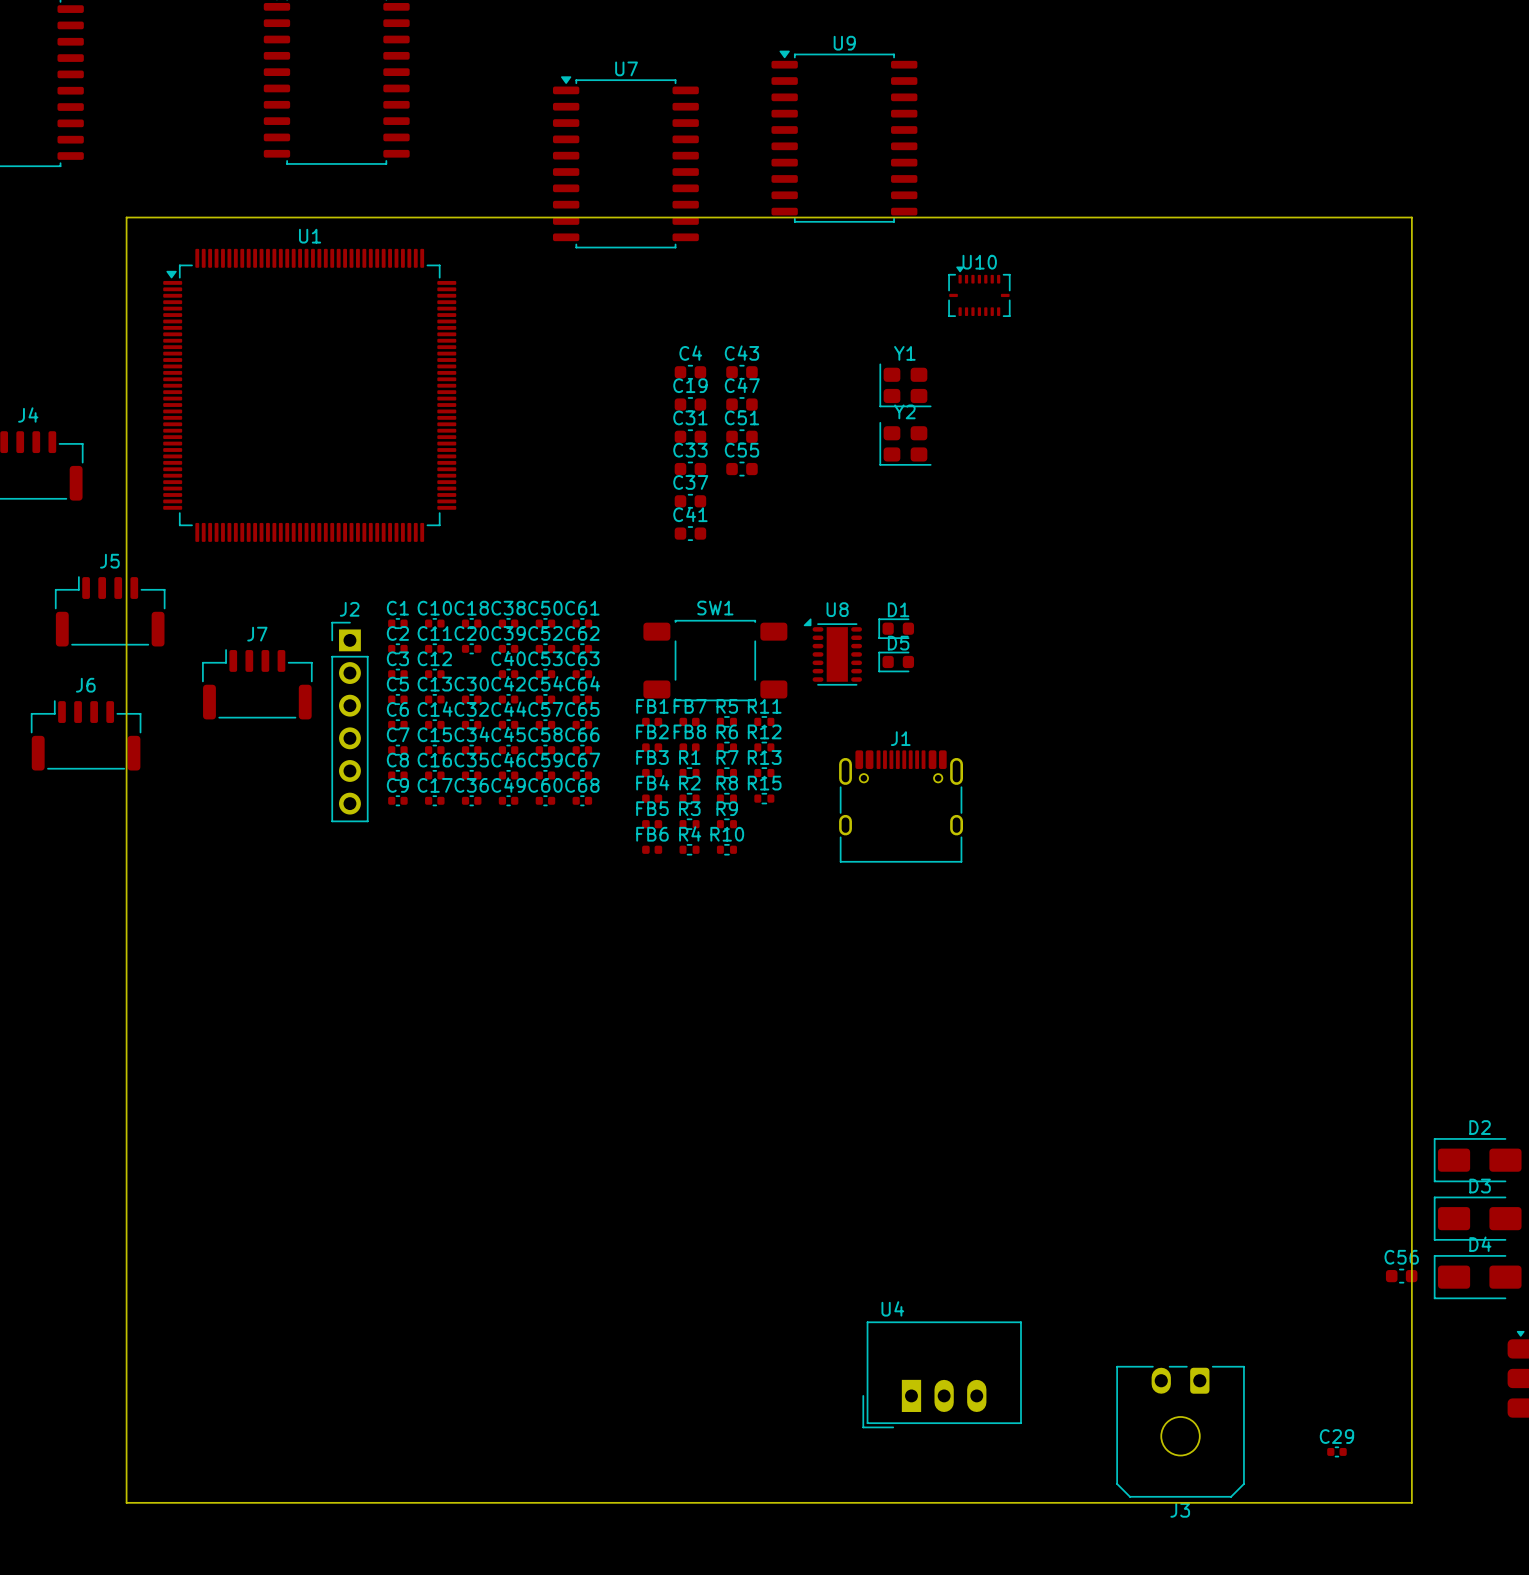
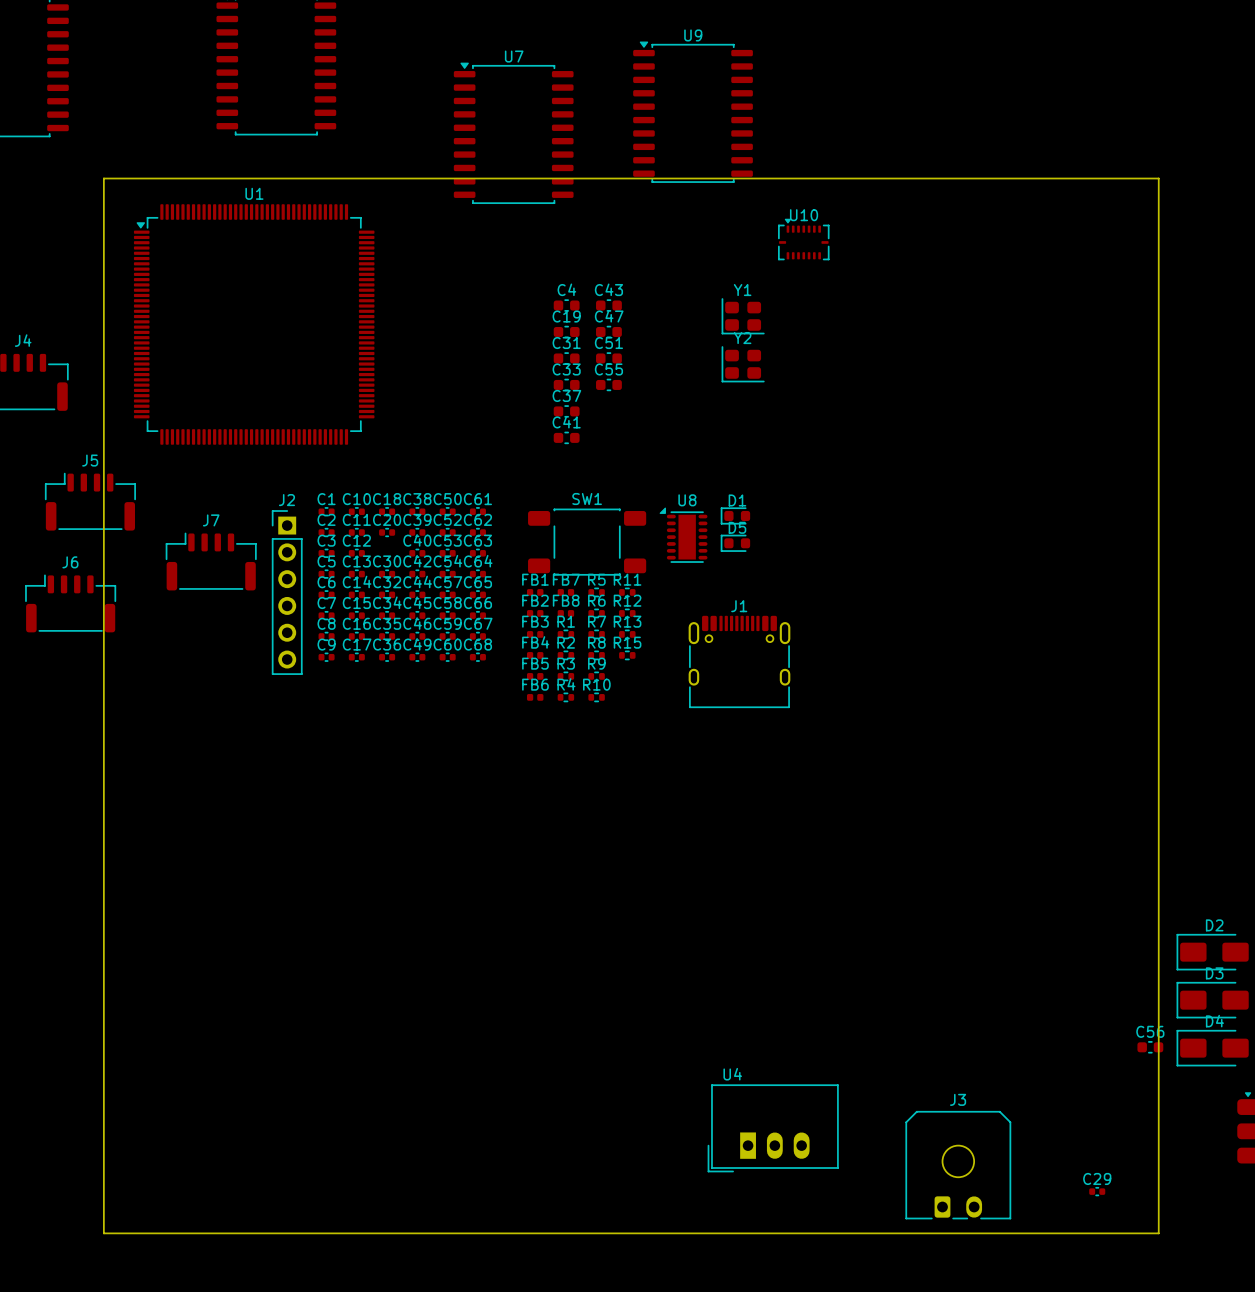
J3 rotation: 0° (1180, 1431) -> 180° (958, 1165)

